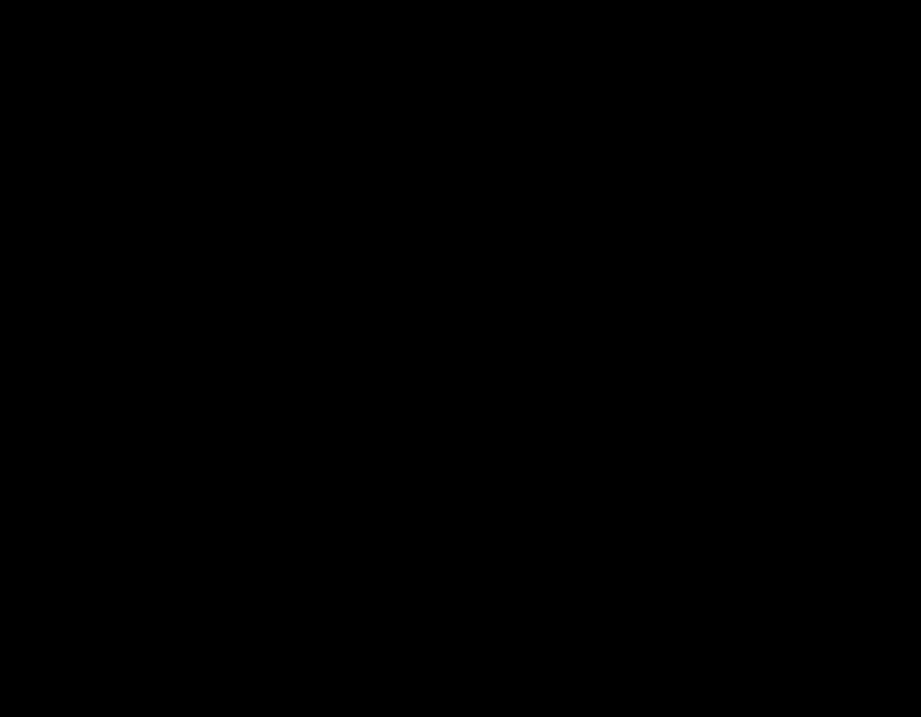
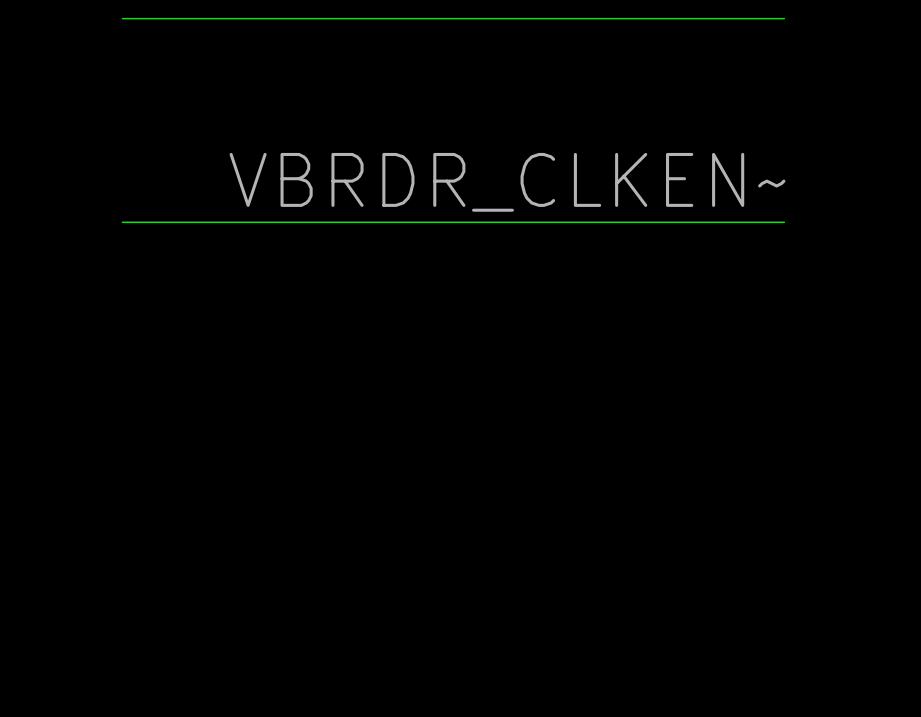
wire: none -> (122, 18) (784, 18)
label: none -> VBRDR_CLKEN~ (507, 182)
wire: none -> (122, 222) (784, 222)

